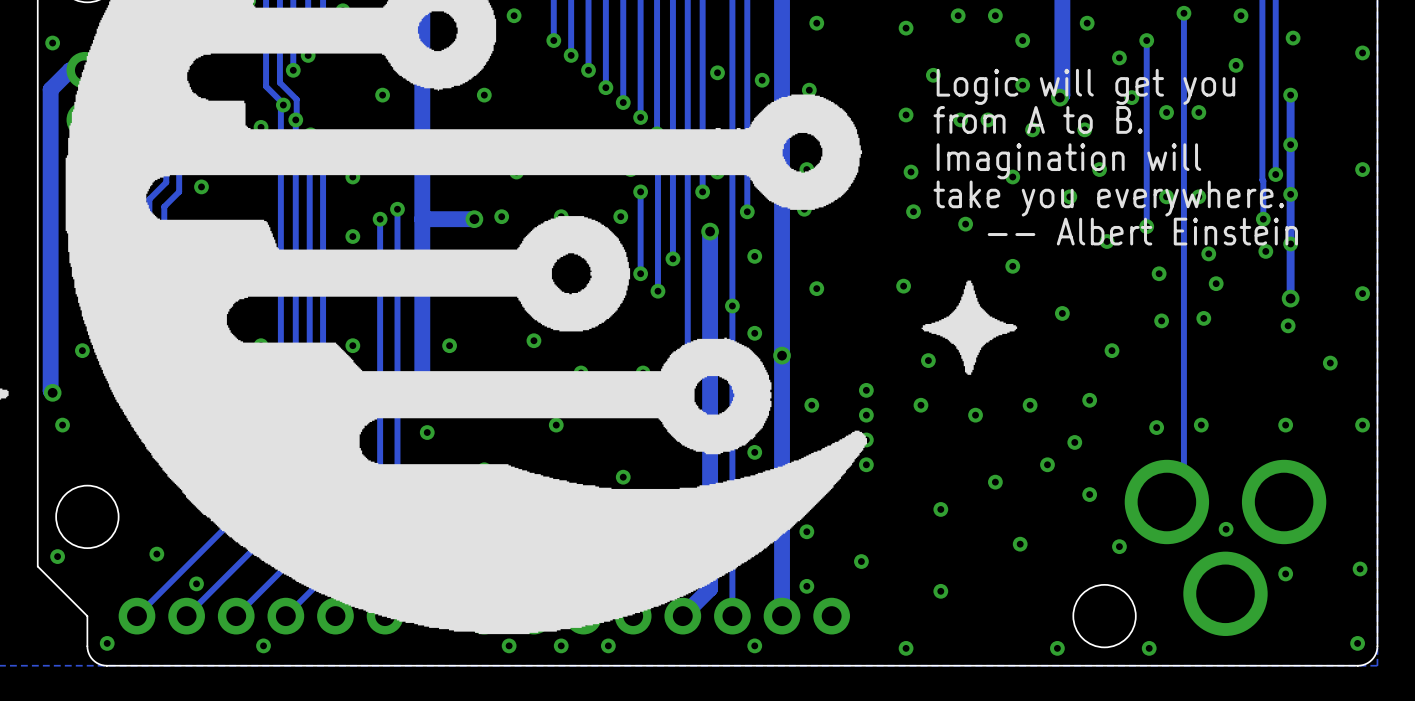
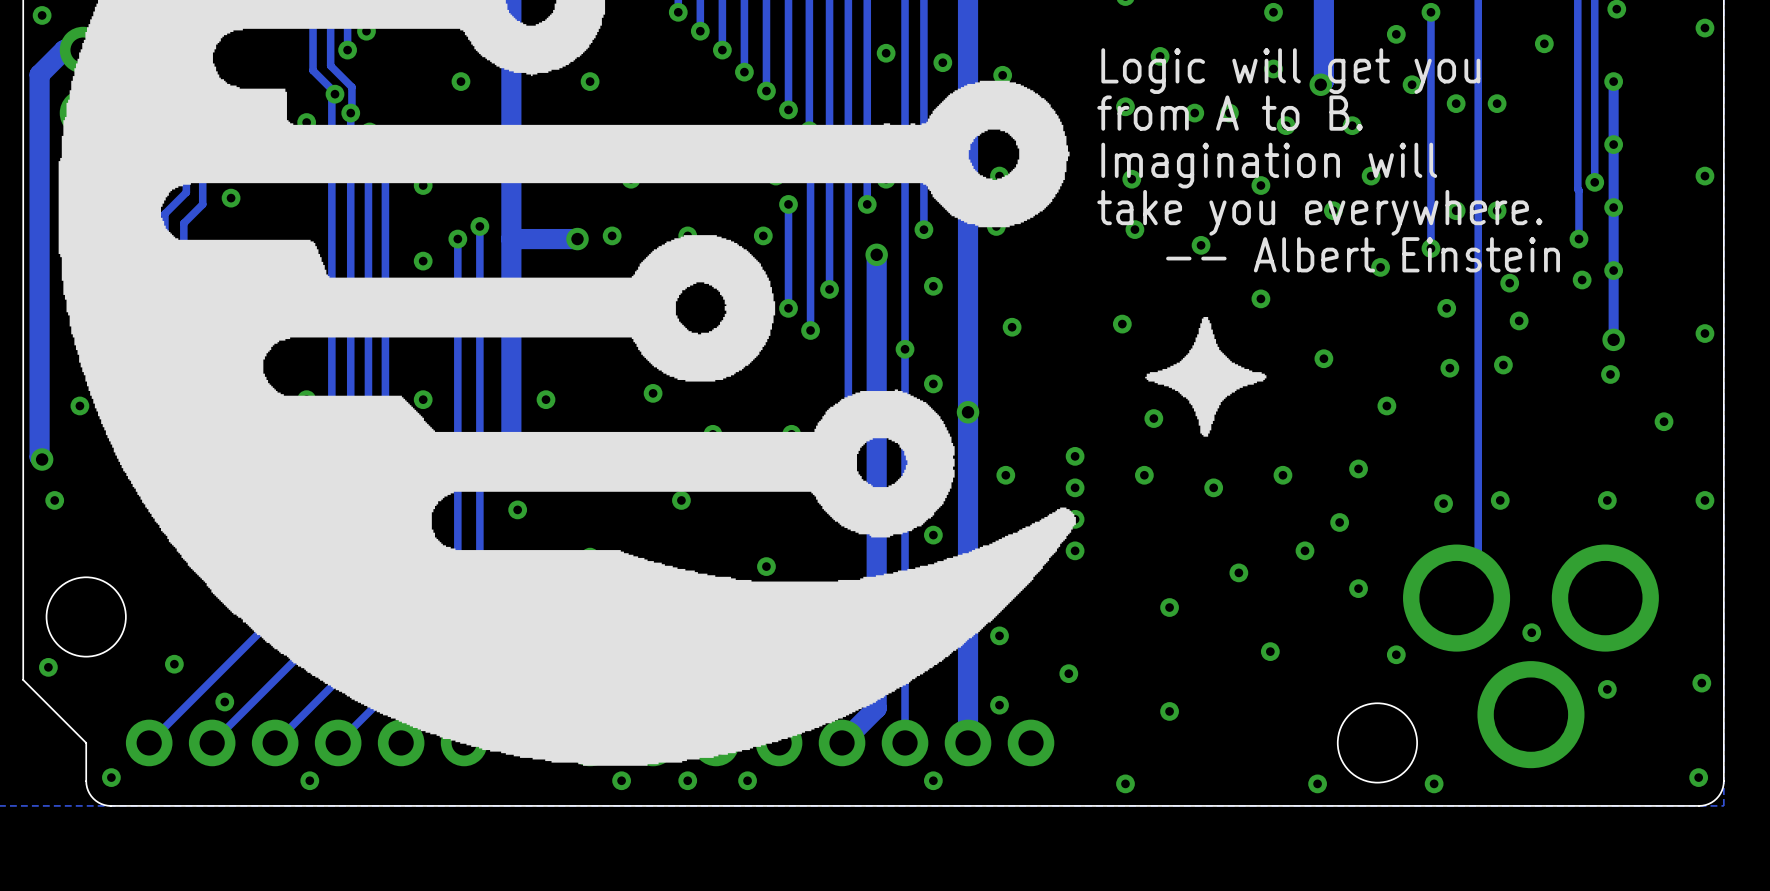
text position: Logic will get you (1085, 86) -> Logic will get you (1290, 71)
text position: from A to B. (1038, 119) -> from A to B. (1230, 113)
text position: Imagination will (1068, 161) -> Imagination will (1269, 165)
text position: take you everywhere. (1108, 198) -> take you everywhere. (1319, 212)
text position: -- Albert Einstein (1142, 231) -> -- Albert Einstein (1363, 254)

